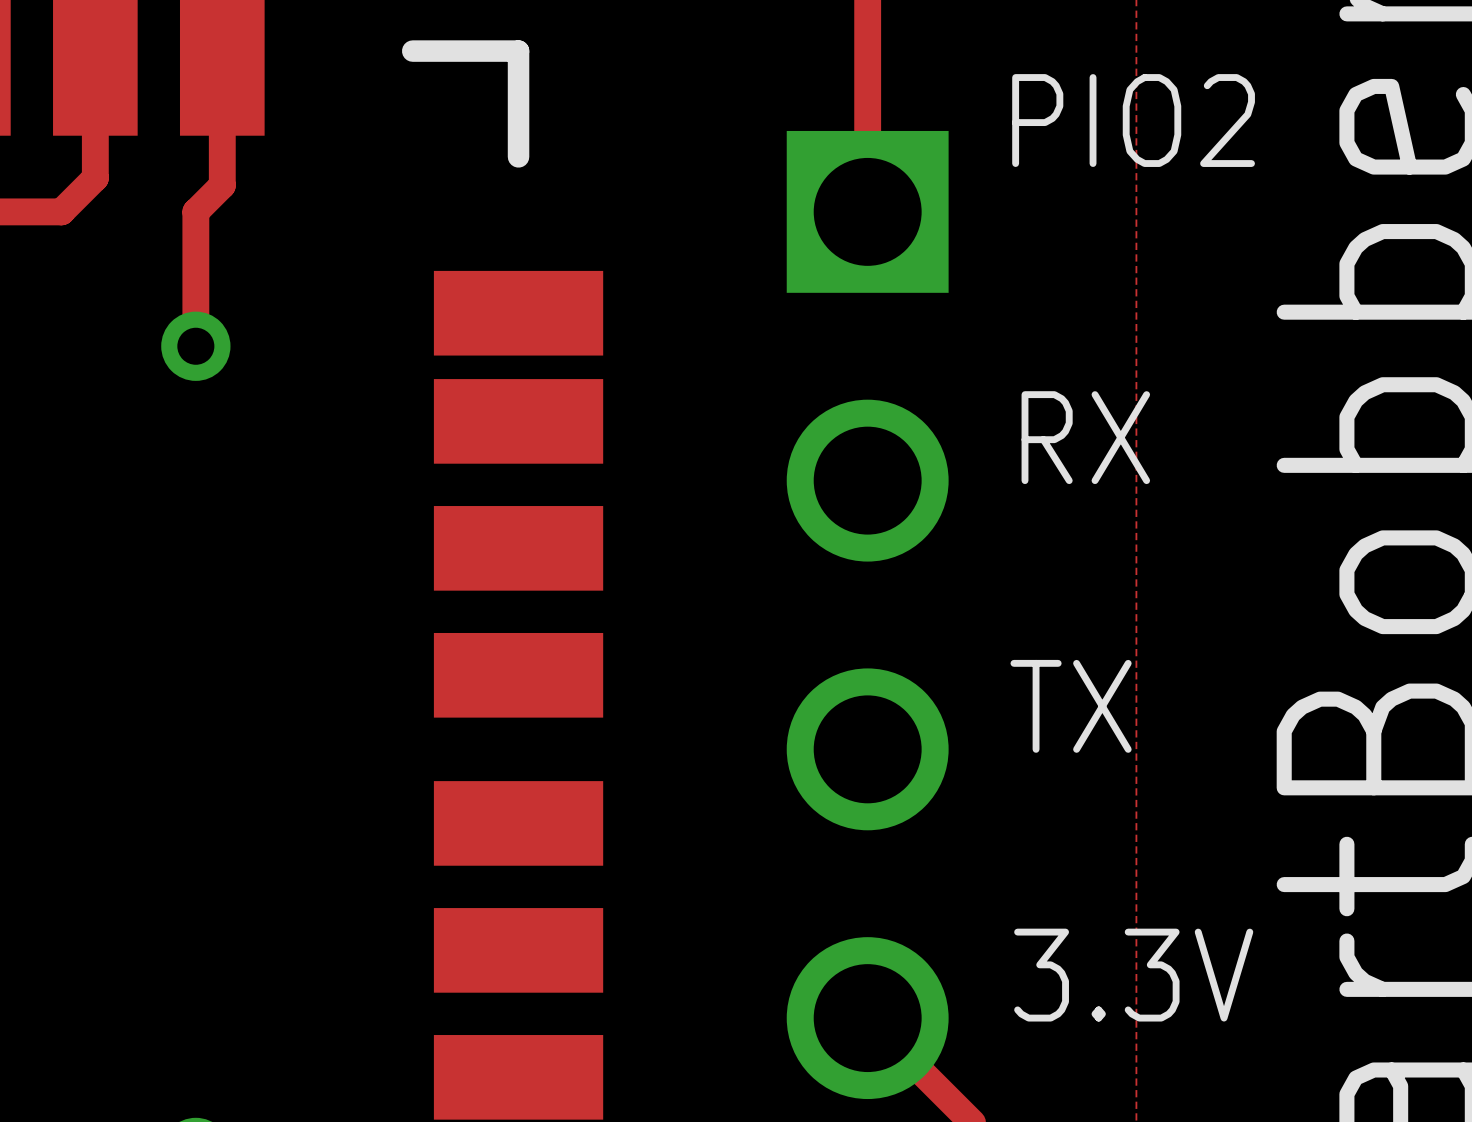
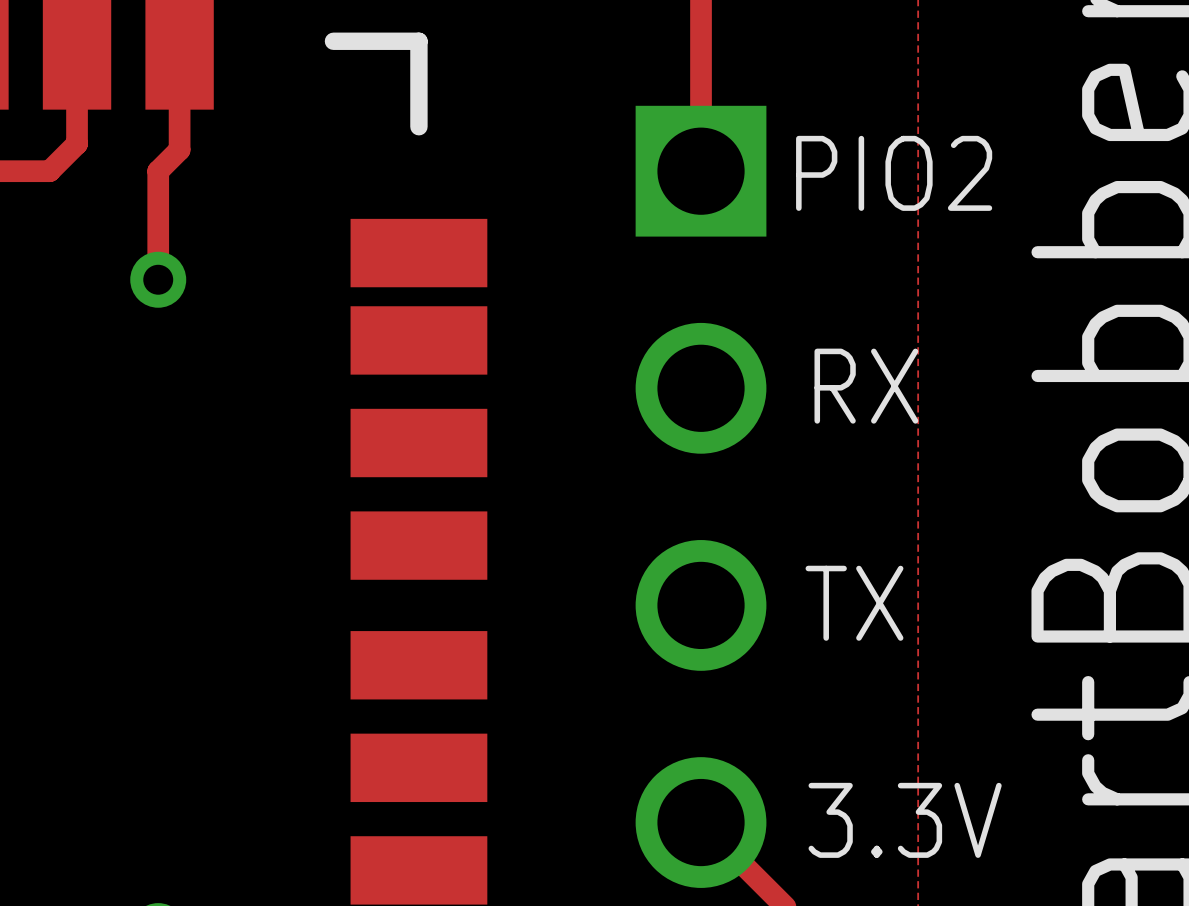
text position: PIO2 (1133, 120) -> PIO2 (894, 173)
text position: RX (1085, 437) -> RX (866, 386)
text position: TX (1071, 706) -> TX (854, 603)
text position: 3.3V (1133, 975) -> 3.3V (905, 820)

